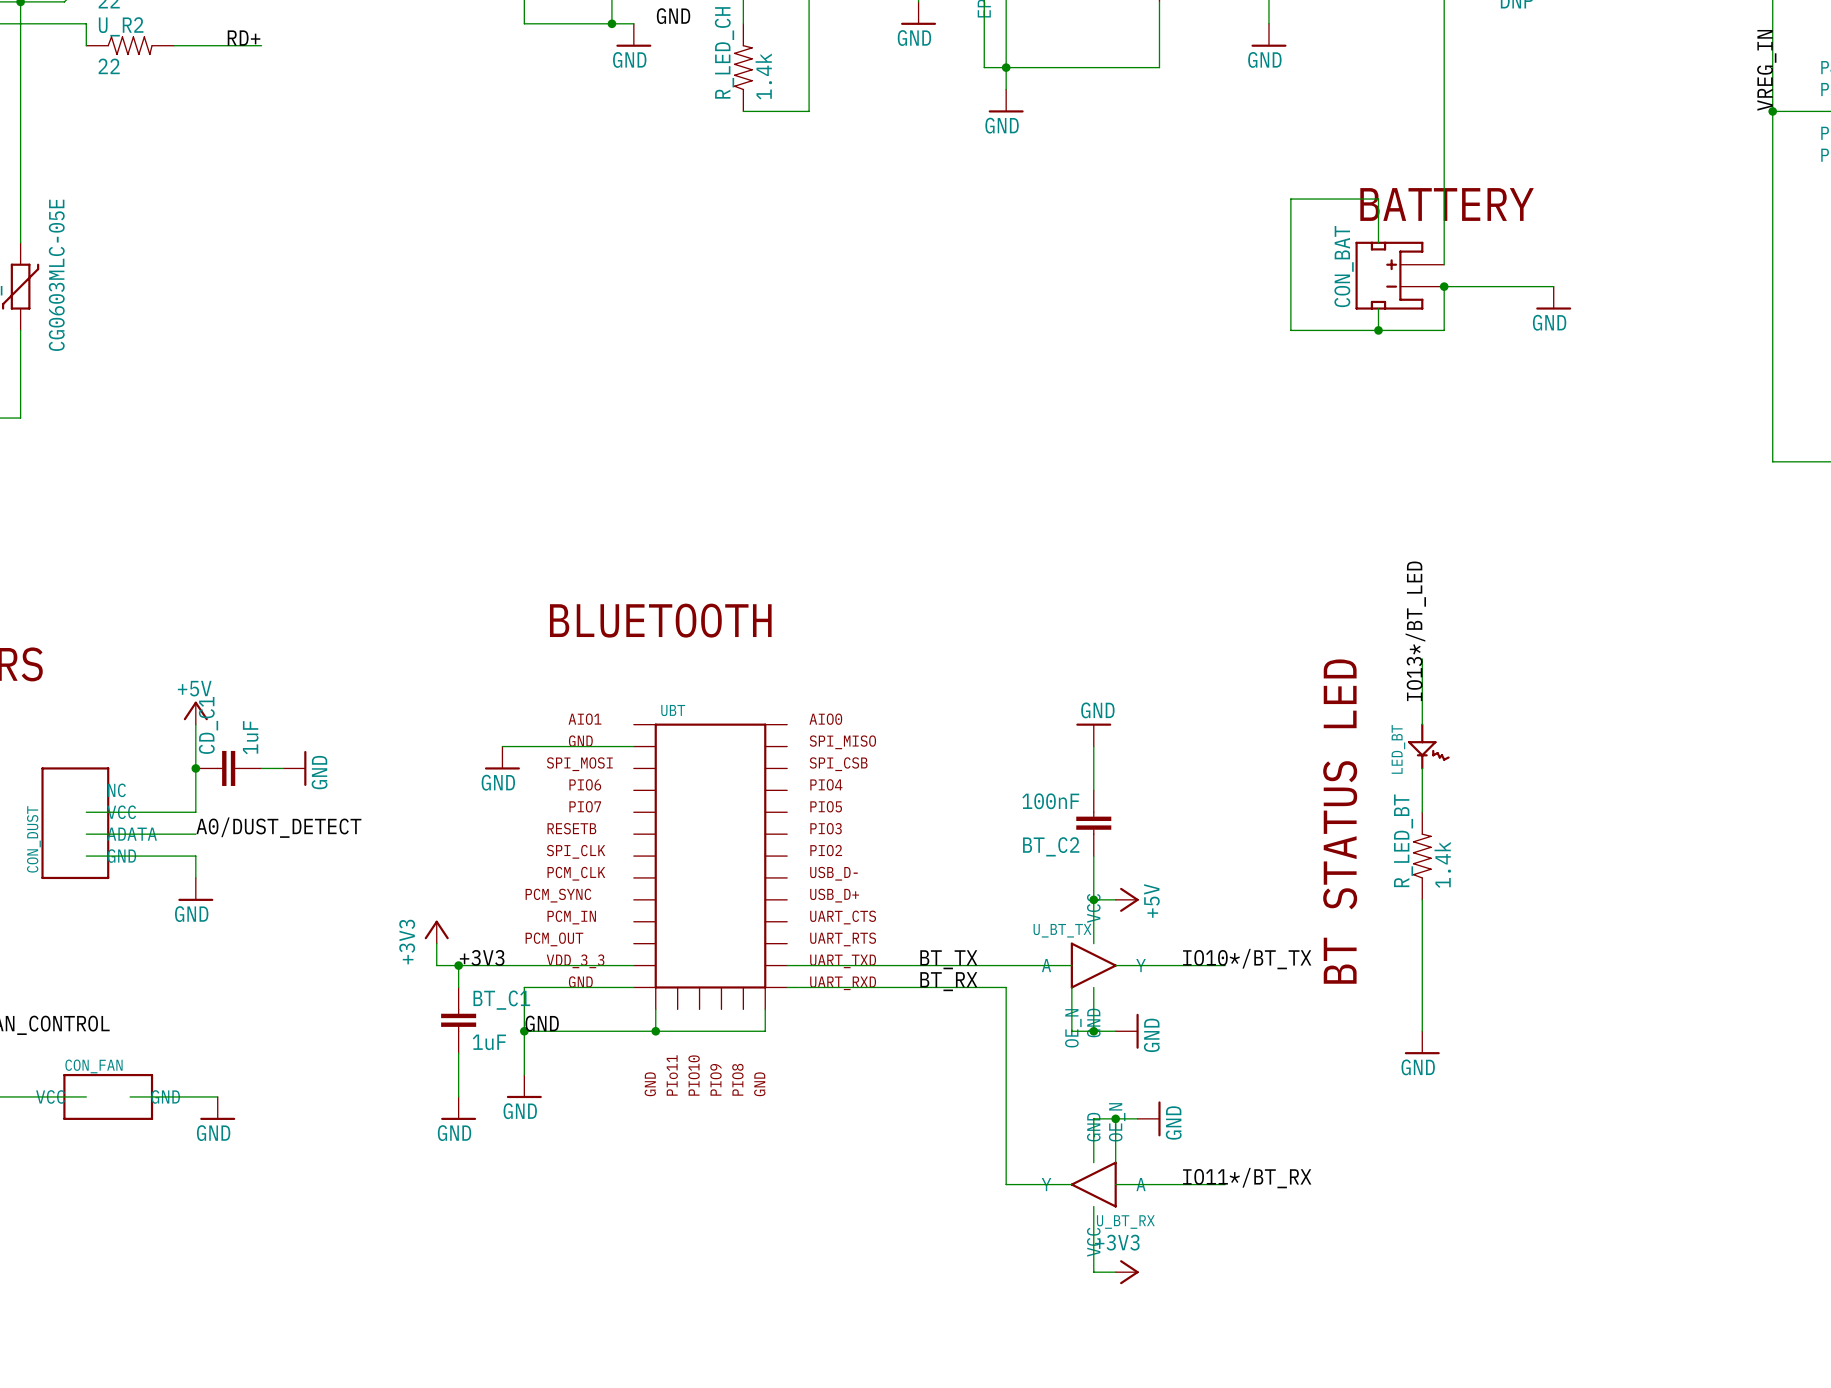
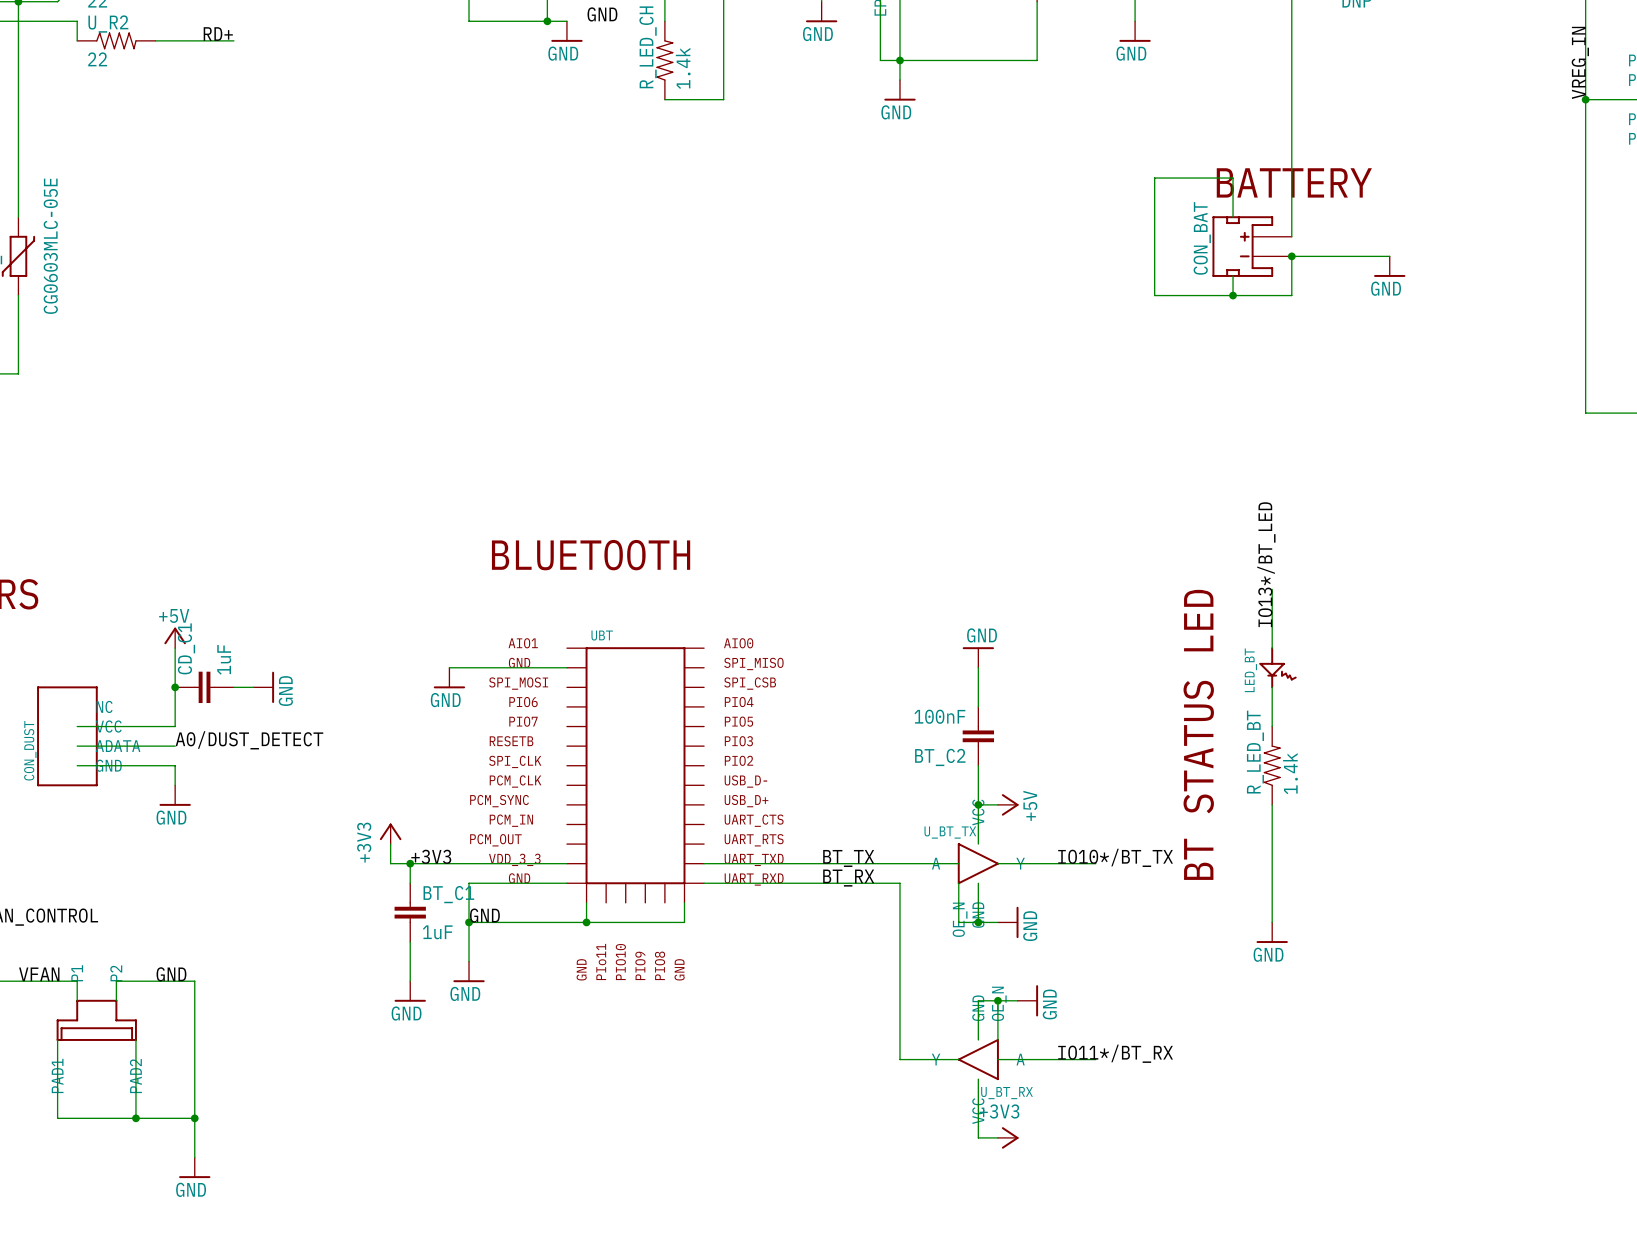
label: none -> VFAN (39, 974)
label: none -> GND (171, 974)
wire: none -> (77, 981) (77, 1000)
CON_FAN: (108, 1096) -> none
wire: none -> (116, 981) (116, 1000)
wire: none -> (194, 981) (194, 1157)
power symbol position: GND (217, 1108) -> GND (194, 1167)
part: none -> (96, 1020)
wire: none -> (57, 1039) (57, 1118) (194, 1118)
wire: none -> (135, 1039) (135, 1118)
junction: none -> (135, 1118)
junction: none -> (194, 1118)

